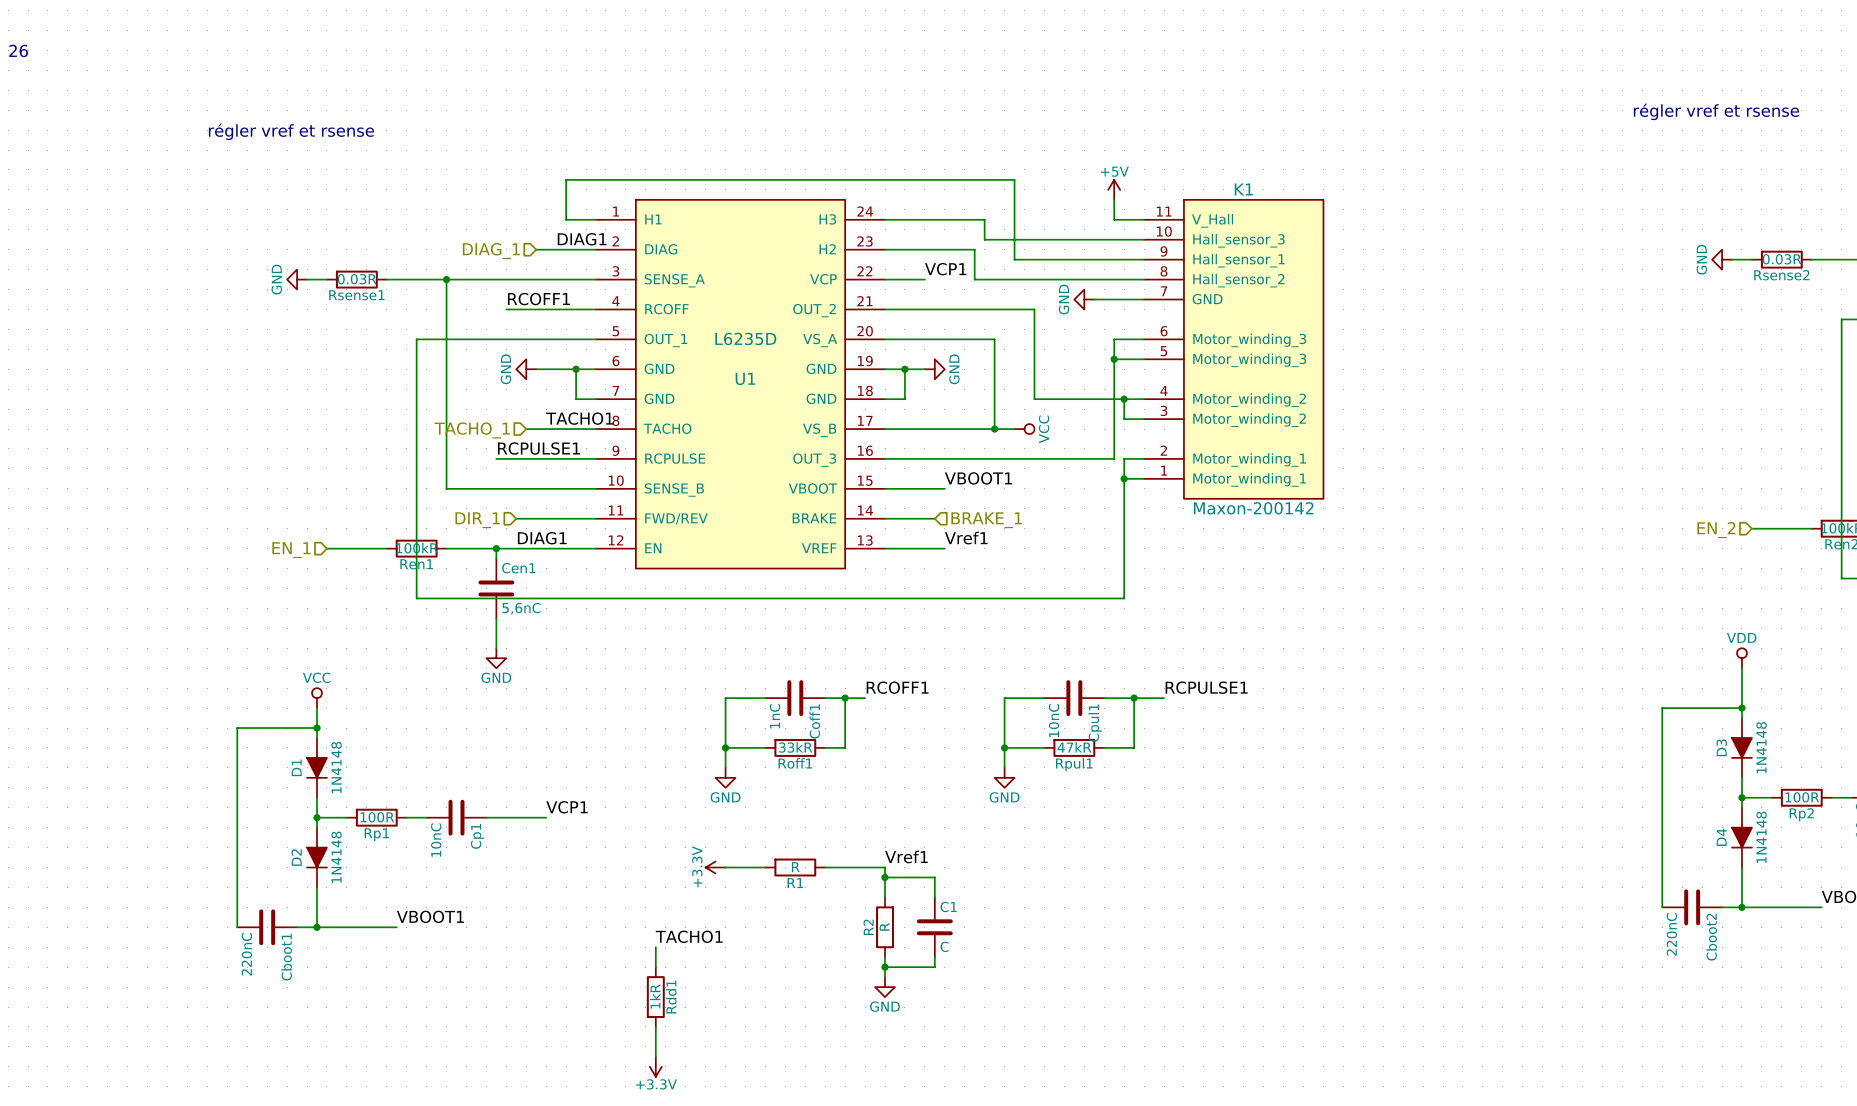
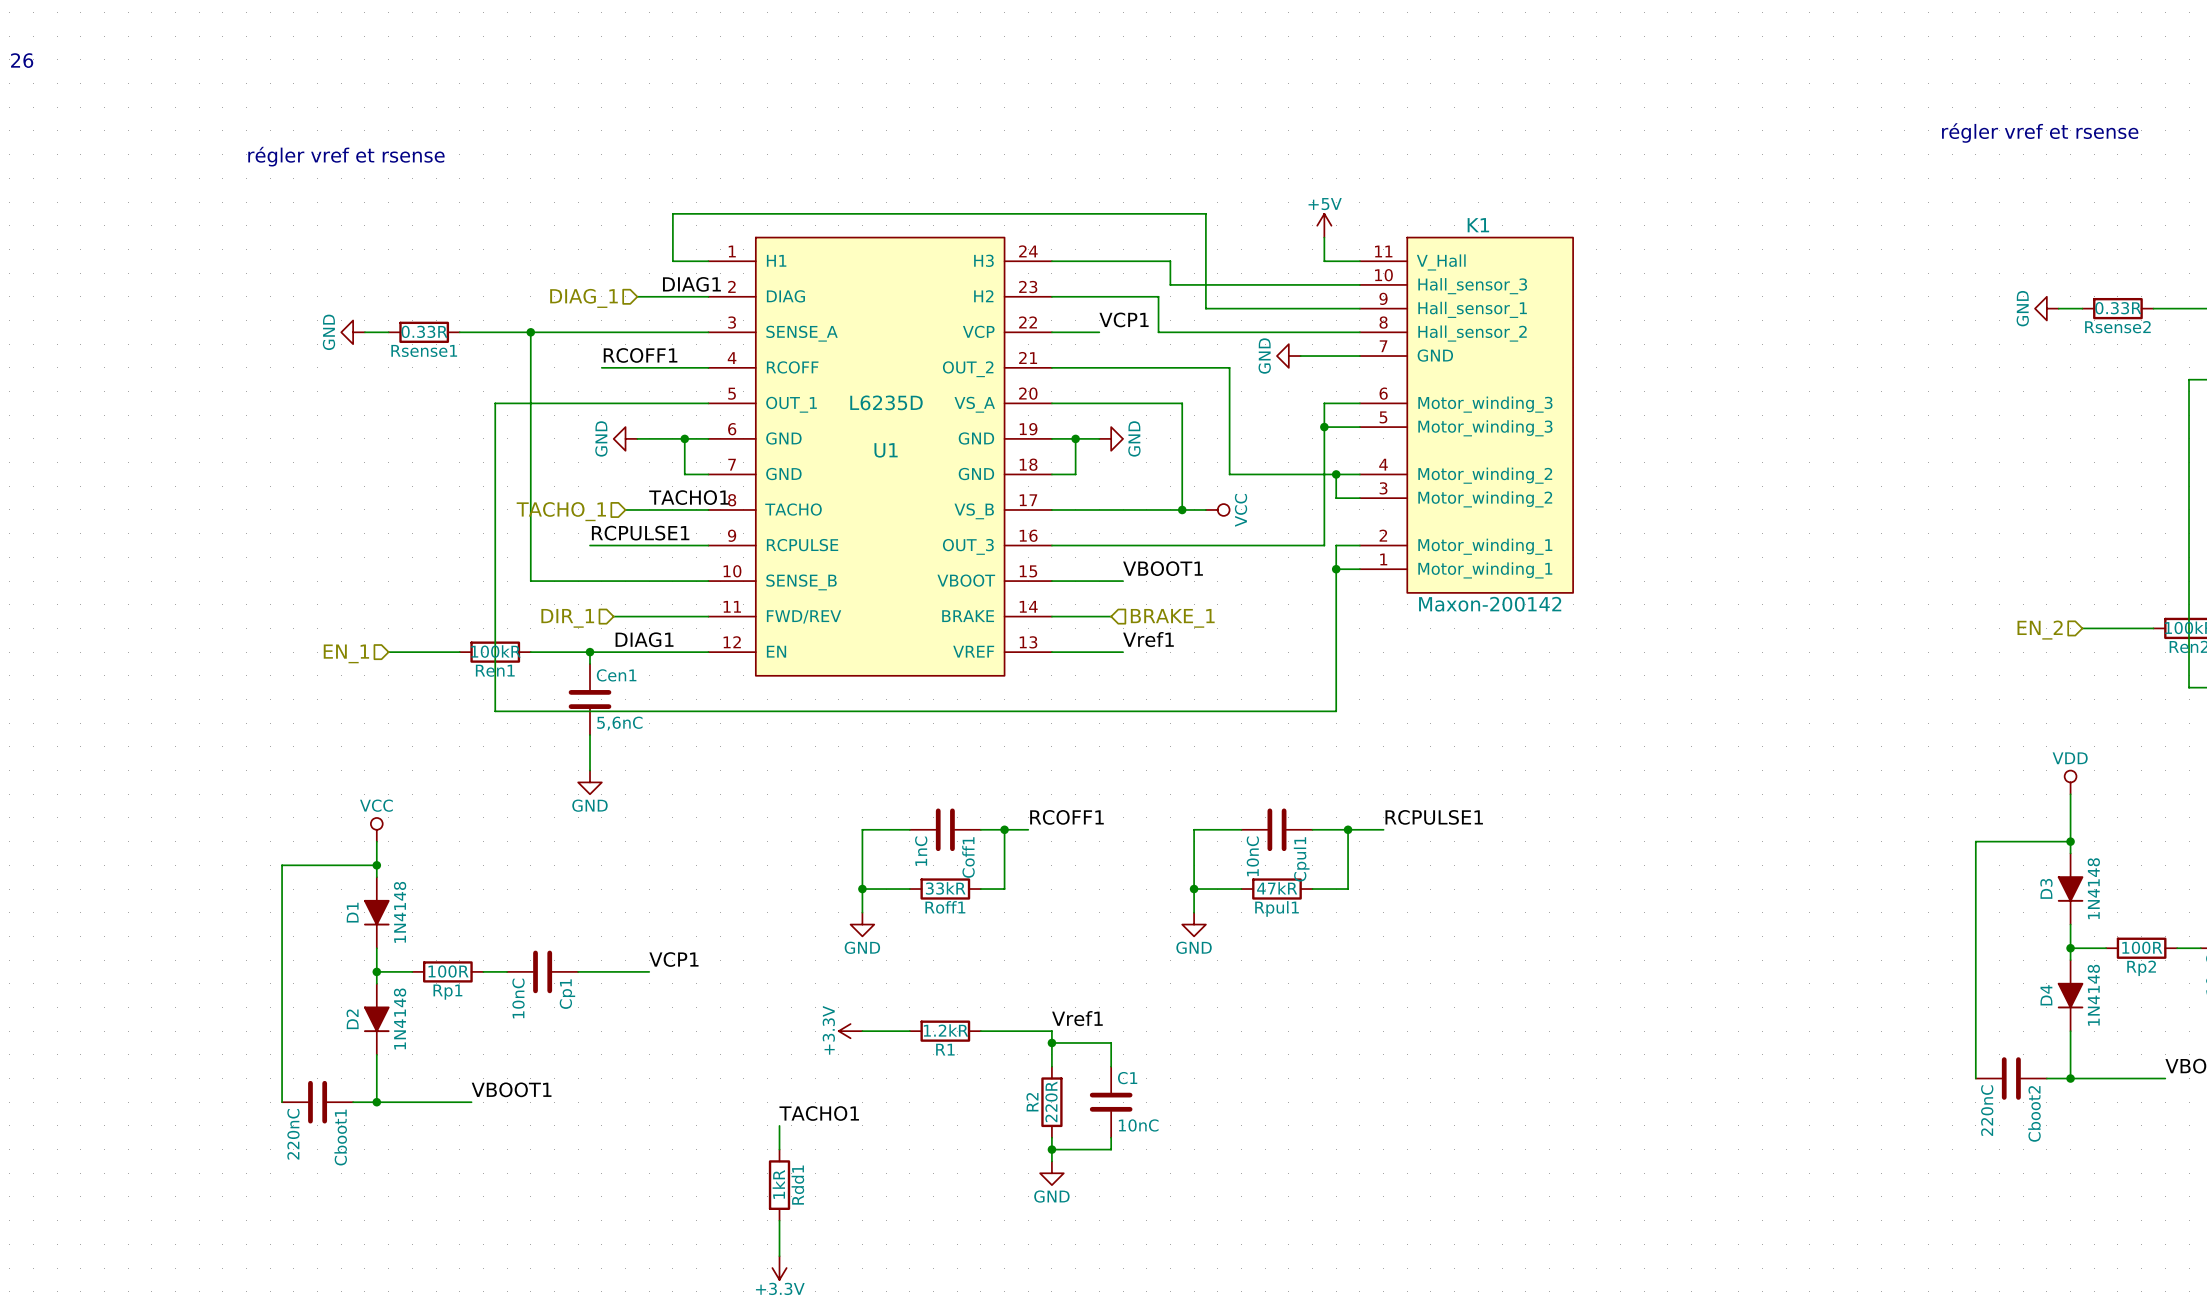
Rsense2 value: 0.03R (1782, 259) -> 0.33R (2118, 308)
Rsense1 value: 0.03R (357, 279) -> 0.33R (424, 331)
R1 value: R (795, 867) -> 1.2kR (945, 1030)
R2 value: R (884, 926) -> 220R (1051, 1101)
C1 value: C (944, 946) -> 10nC (1138, 1125)

